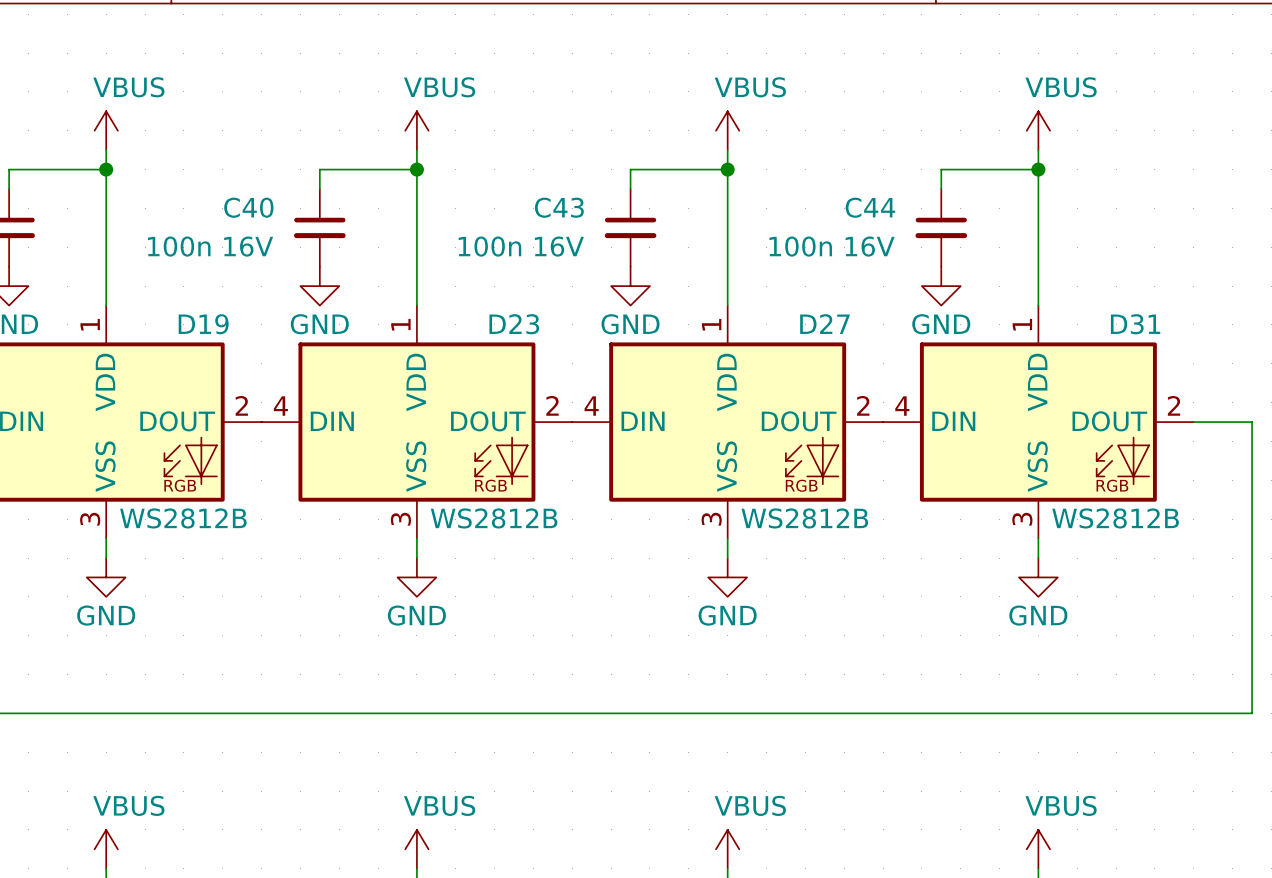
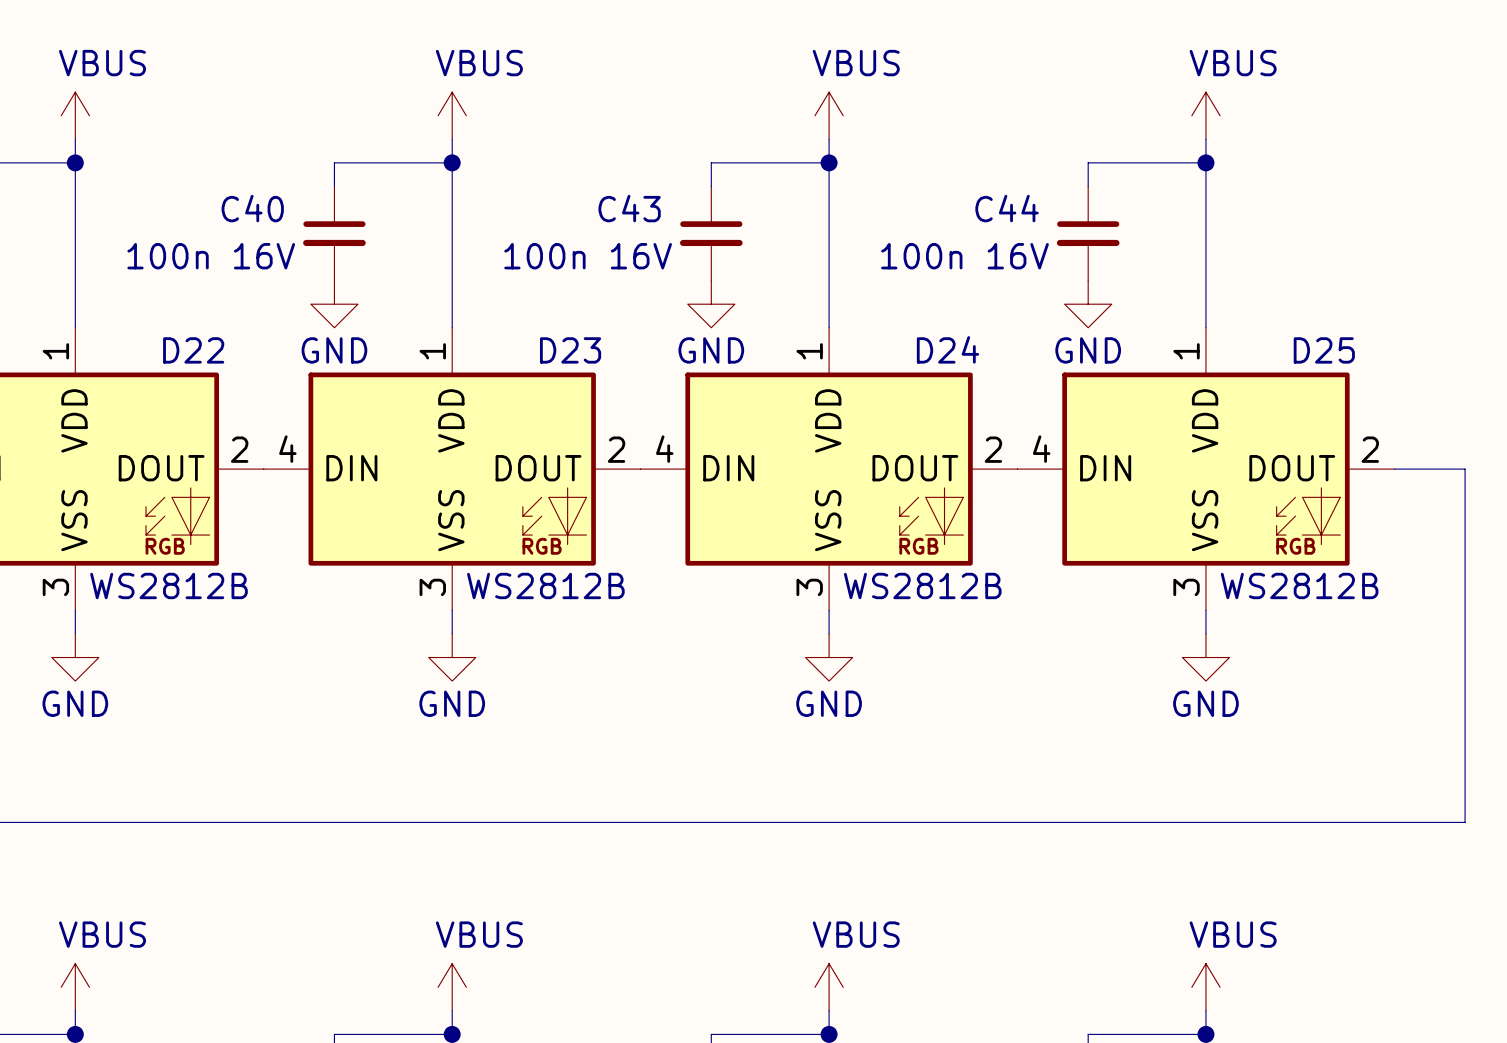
D19 name: D19 (203, 324) -> D22 (193, 350)
D27 name: D27 (824, 324) -> D24 (947, 349)
D31 name: D31 (1135, 324) -> D25 (1324, 350)

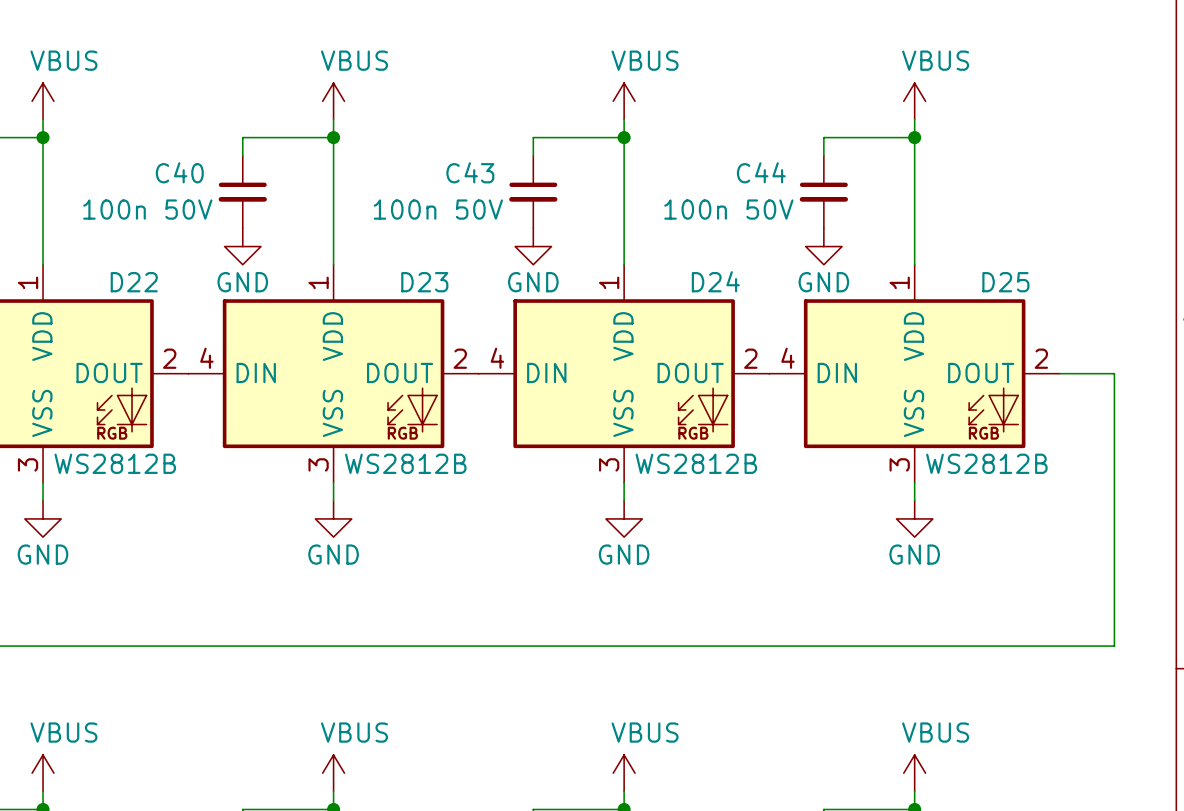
C40 value: 100n 16V (211, 256) -> 100n 50V (147, 209)
C43 value: 100n 16V (588, 256) -> 100n 50V (438, 209)
C44 value: 100n 16V (964, 256) -> 100n 50V (728, 209)

